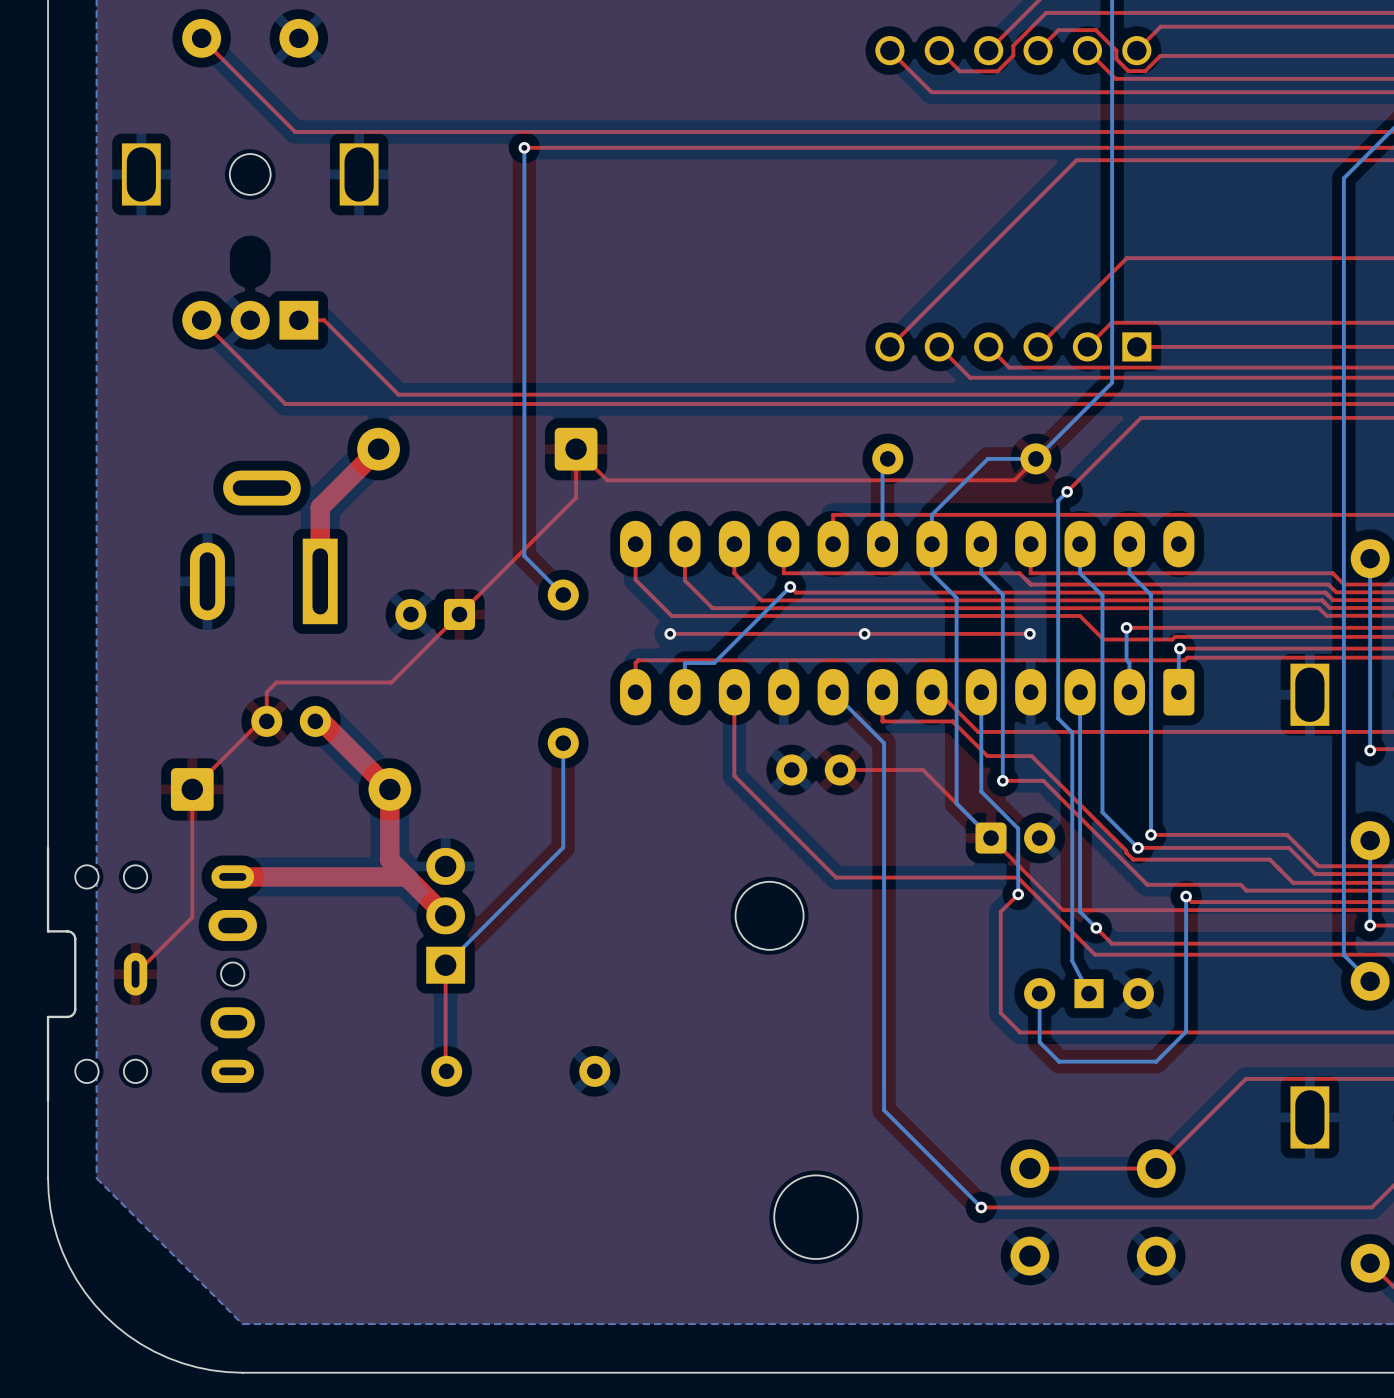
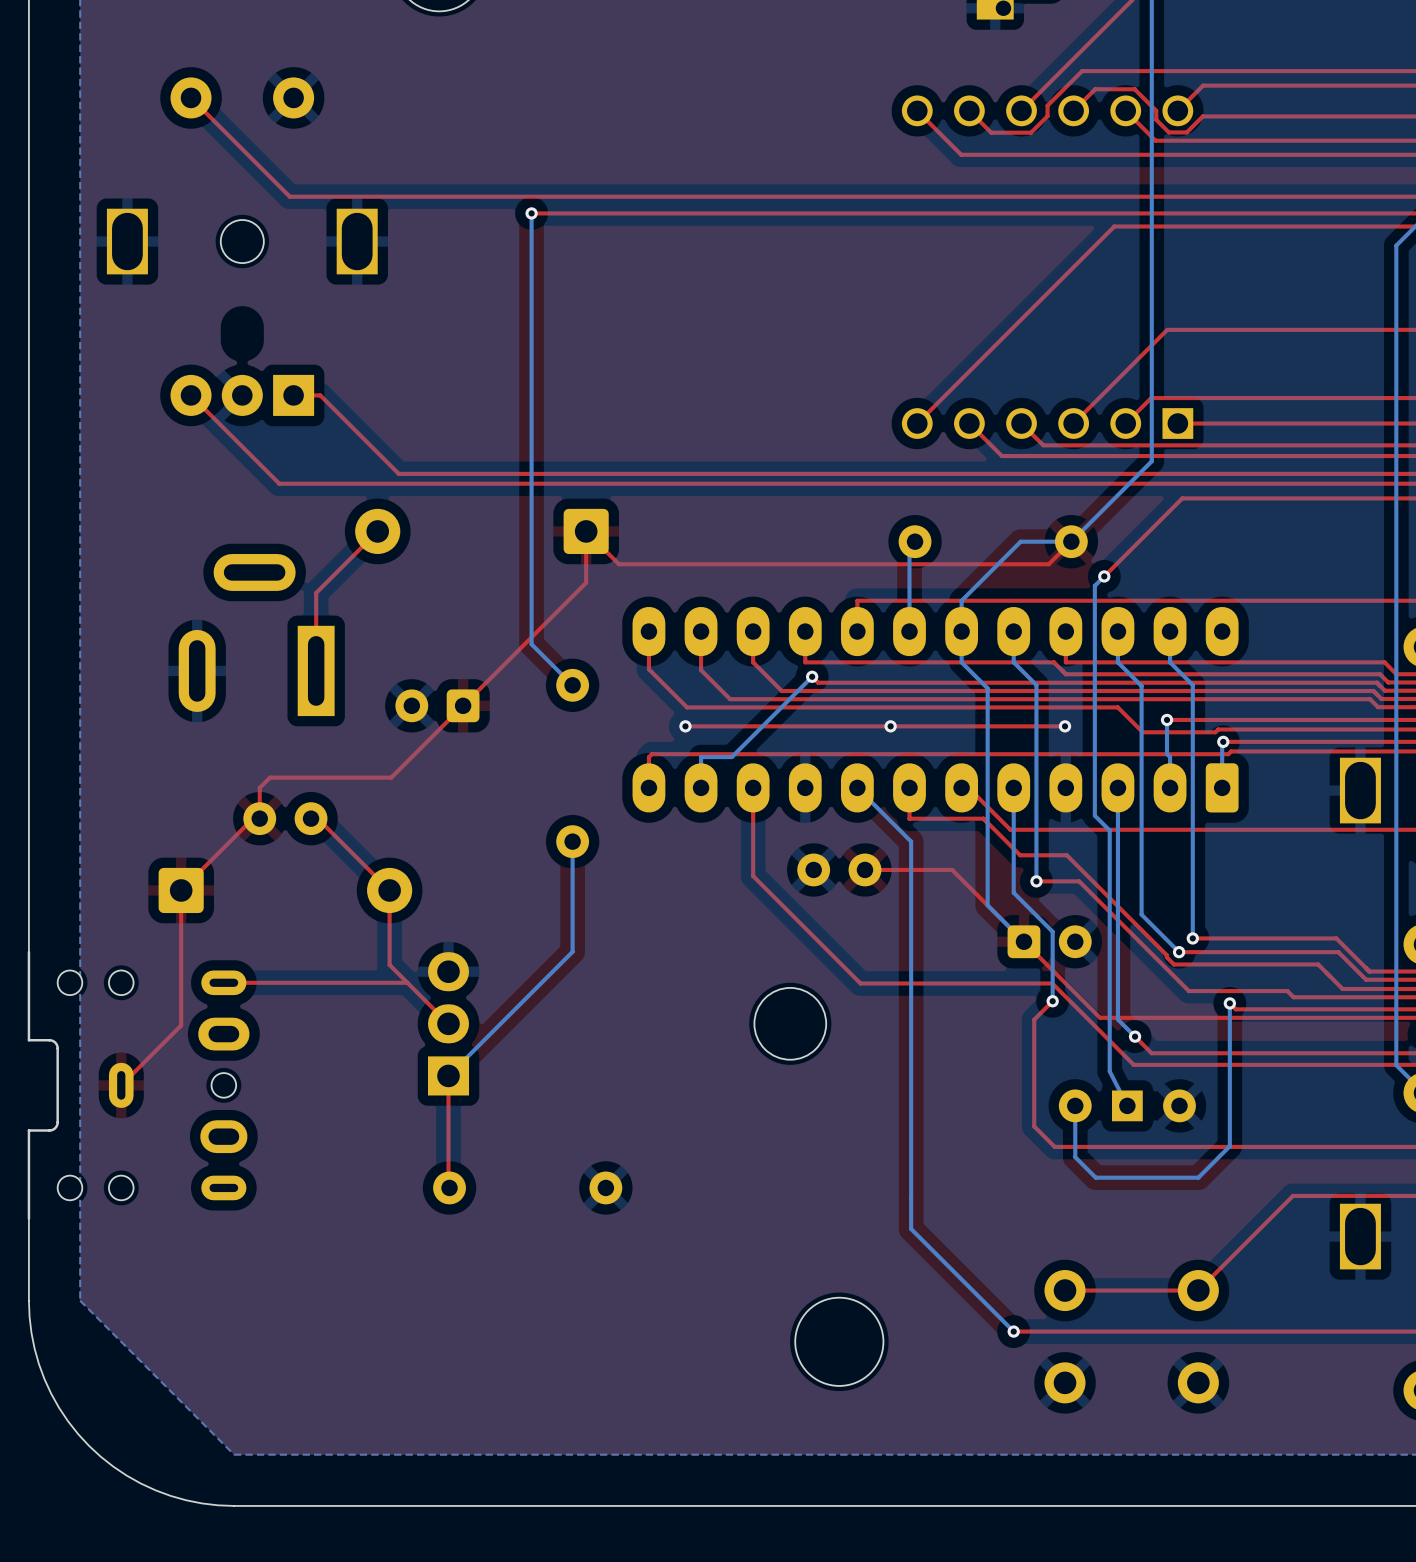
top track width: thick (378, 449) (320, 507) (320, 581) -> thin (377, 531) (316, 592) (316, 670)
top track width: thick (321, 721) (389, 789) (389, 860) (445, 915) -> thin (317, 818) (389, 890) (389, 964) (448, 1023)
top track width: thick (406, 876) (232, 876) -> thin (407, 982) (223, 982)

